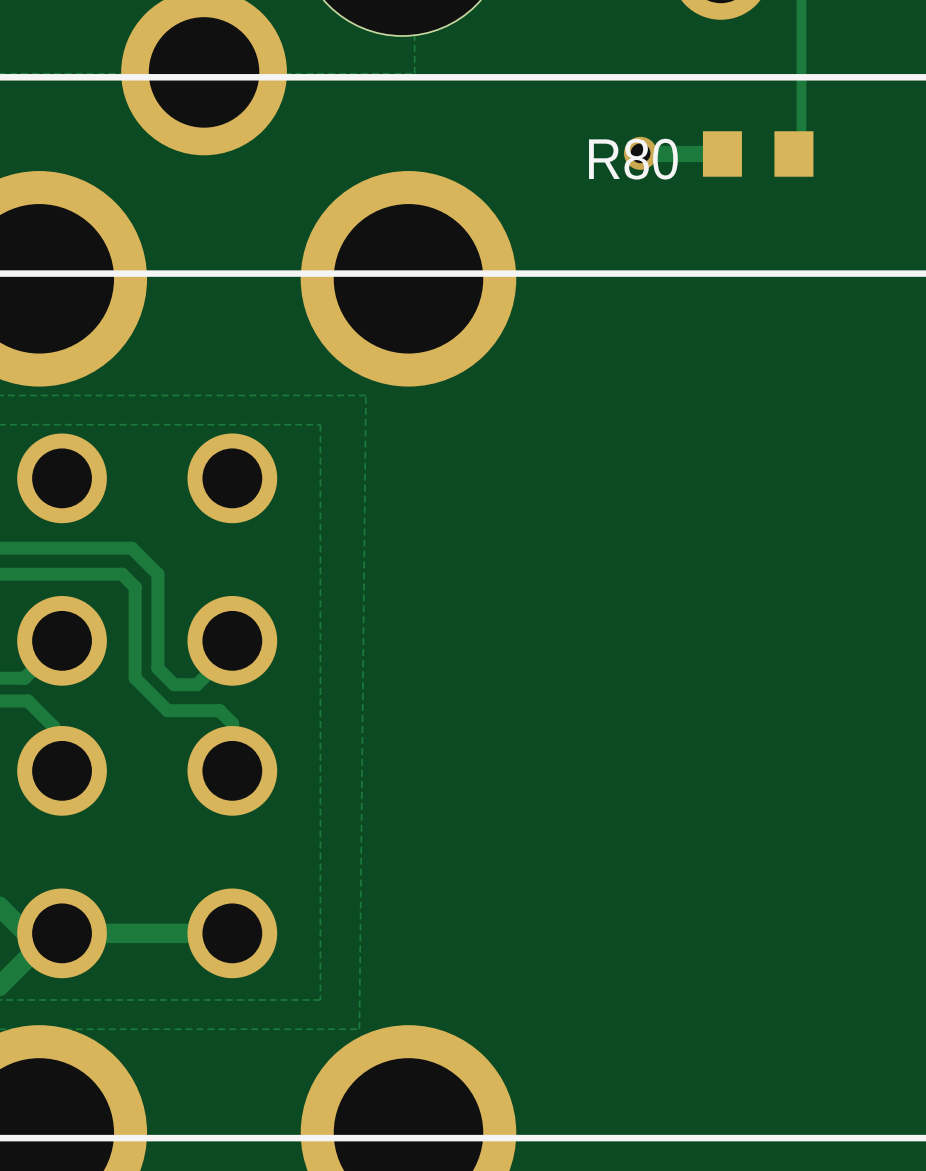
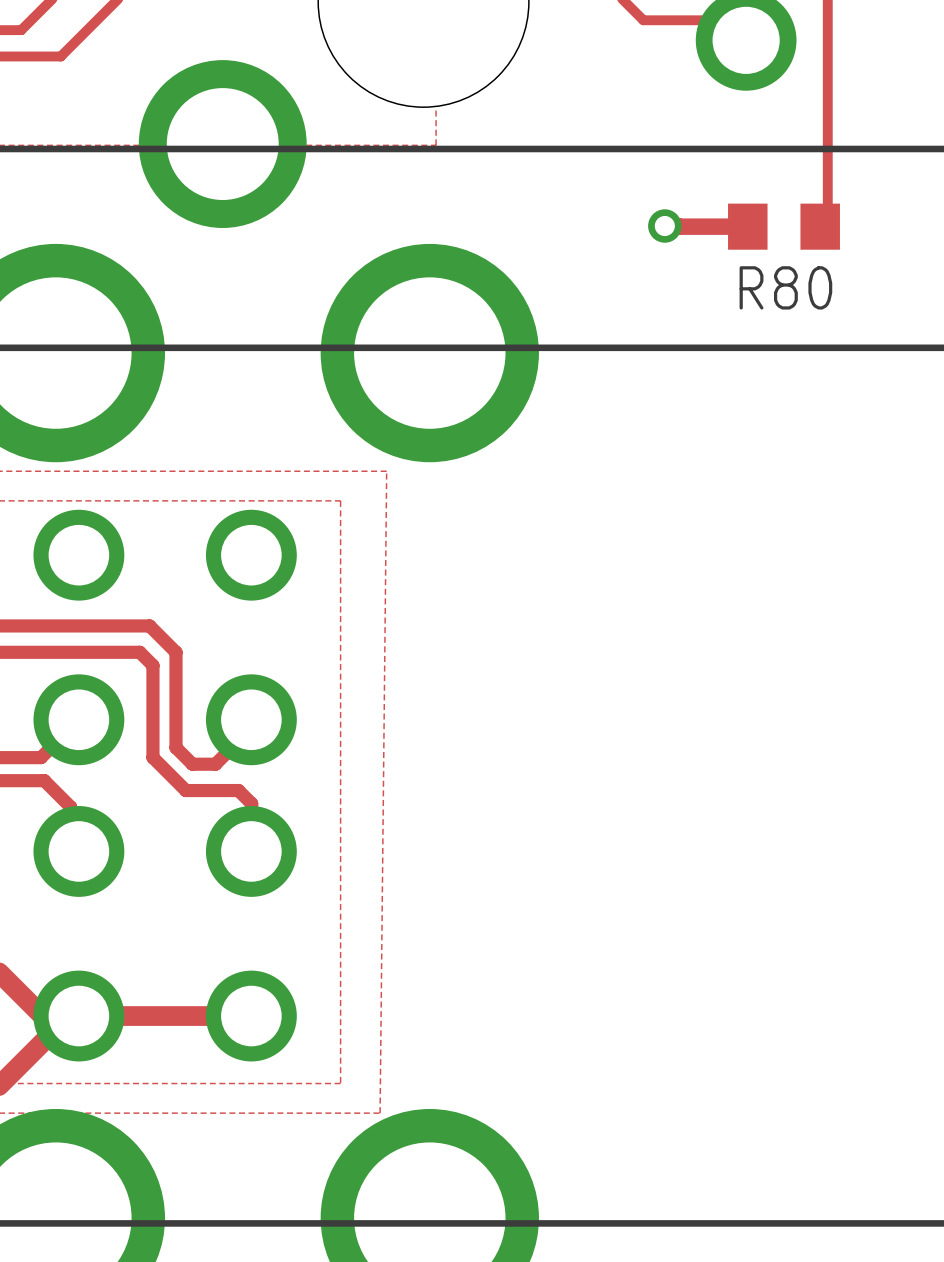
R80 name position: R80 (633, 159) -> R80 (785, 287)

